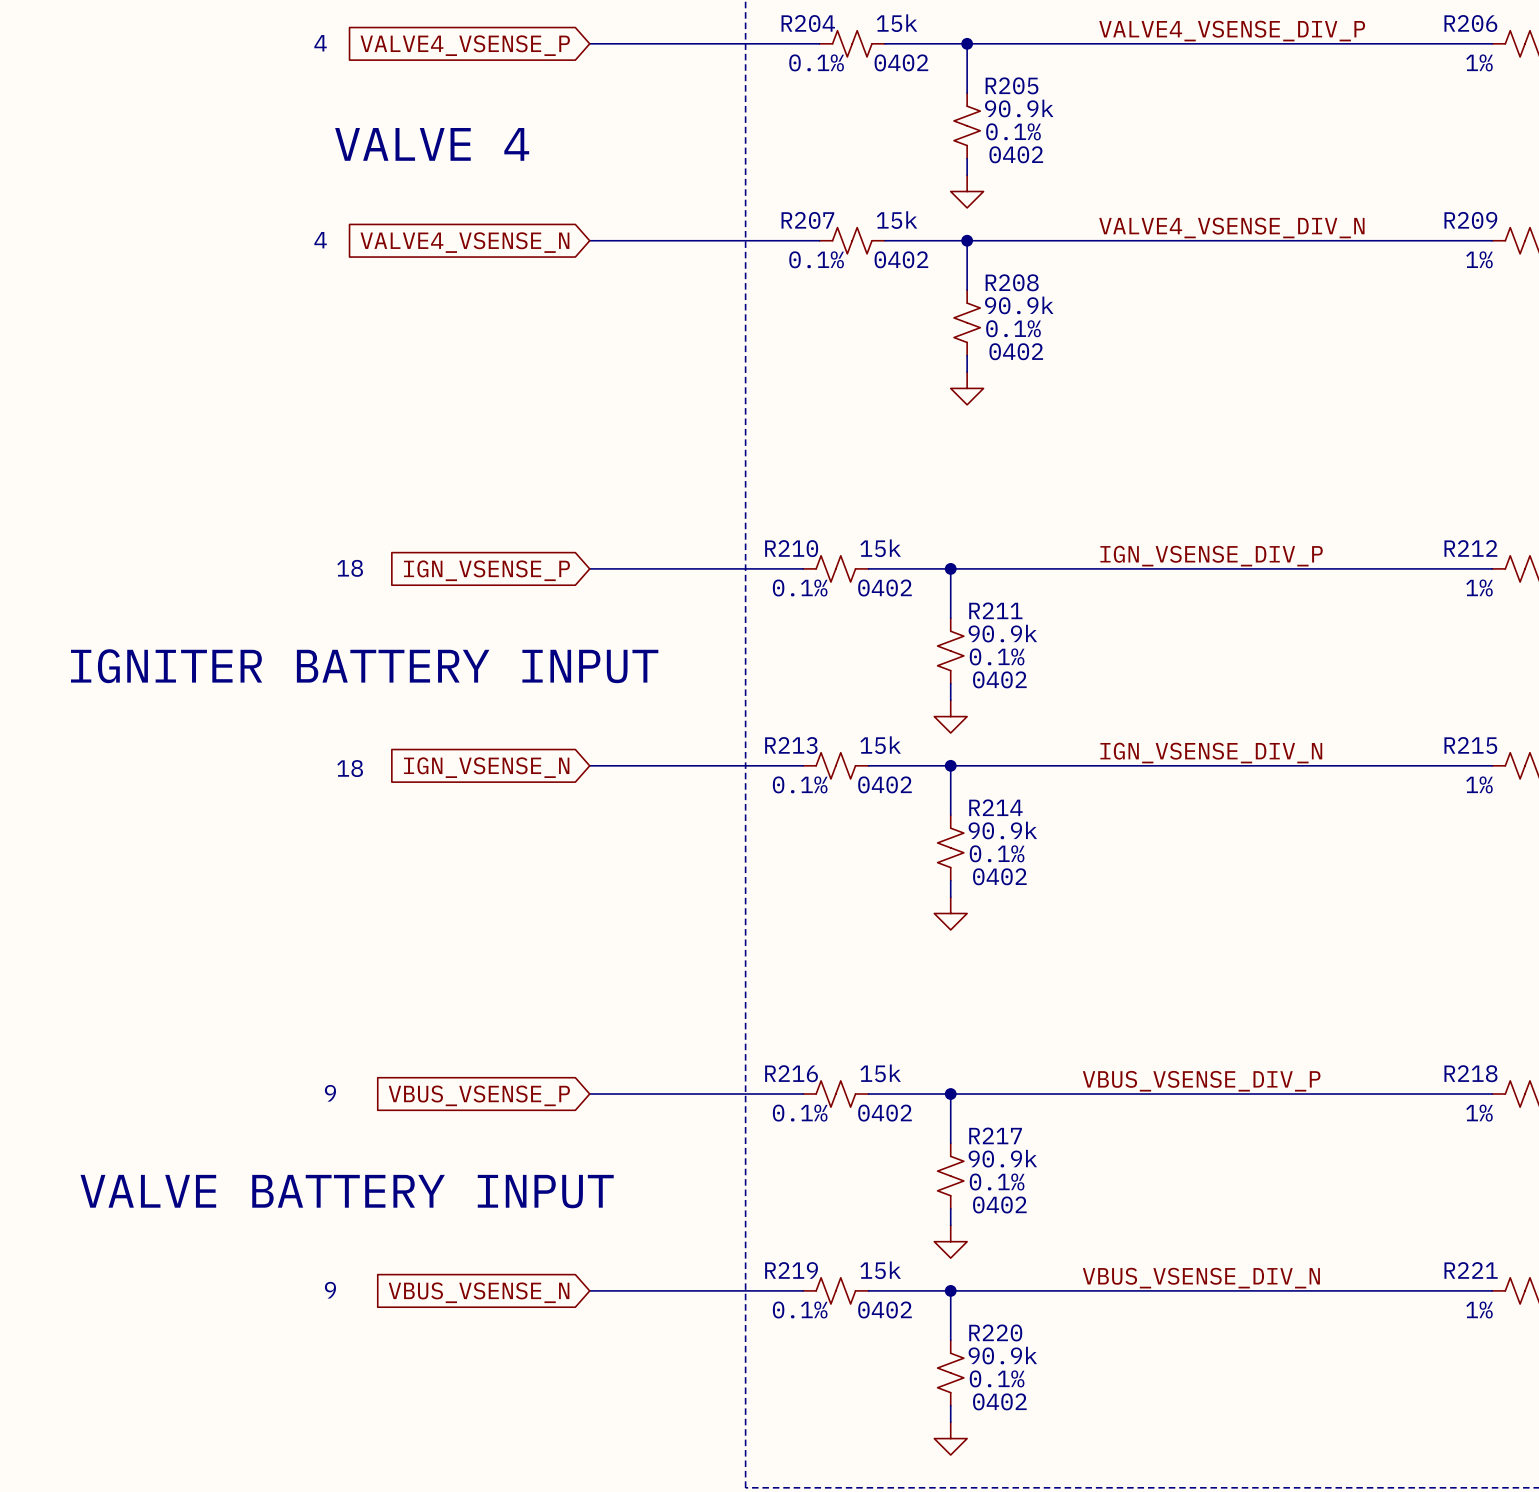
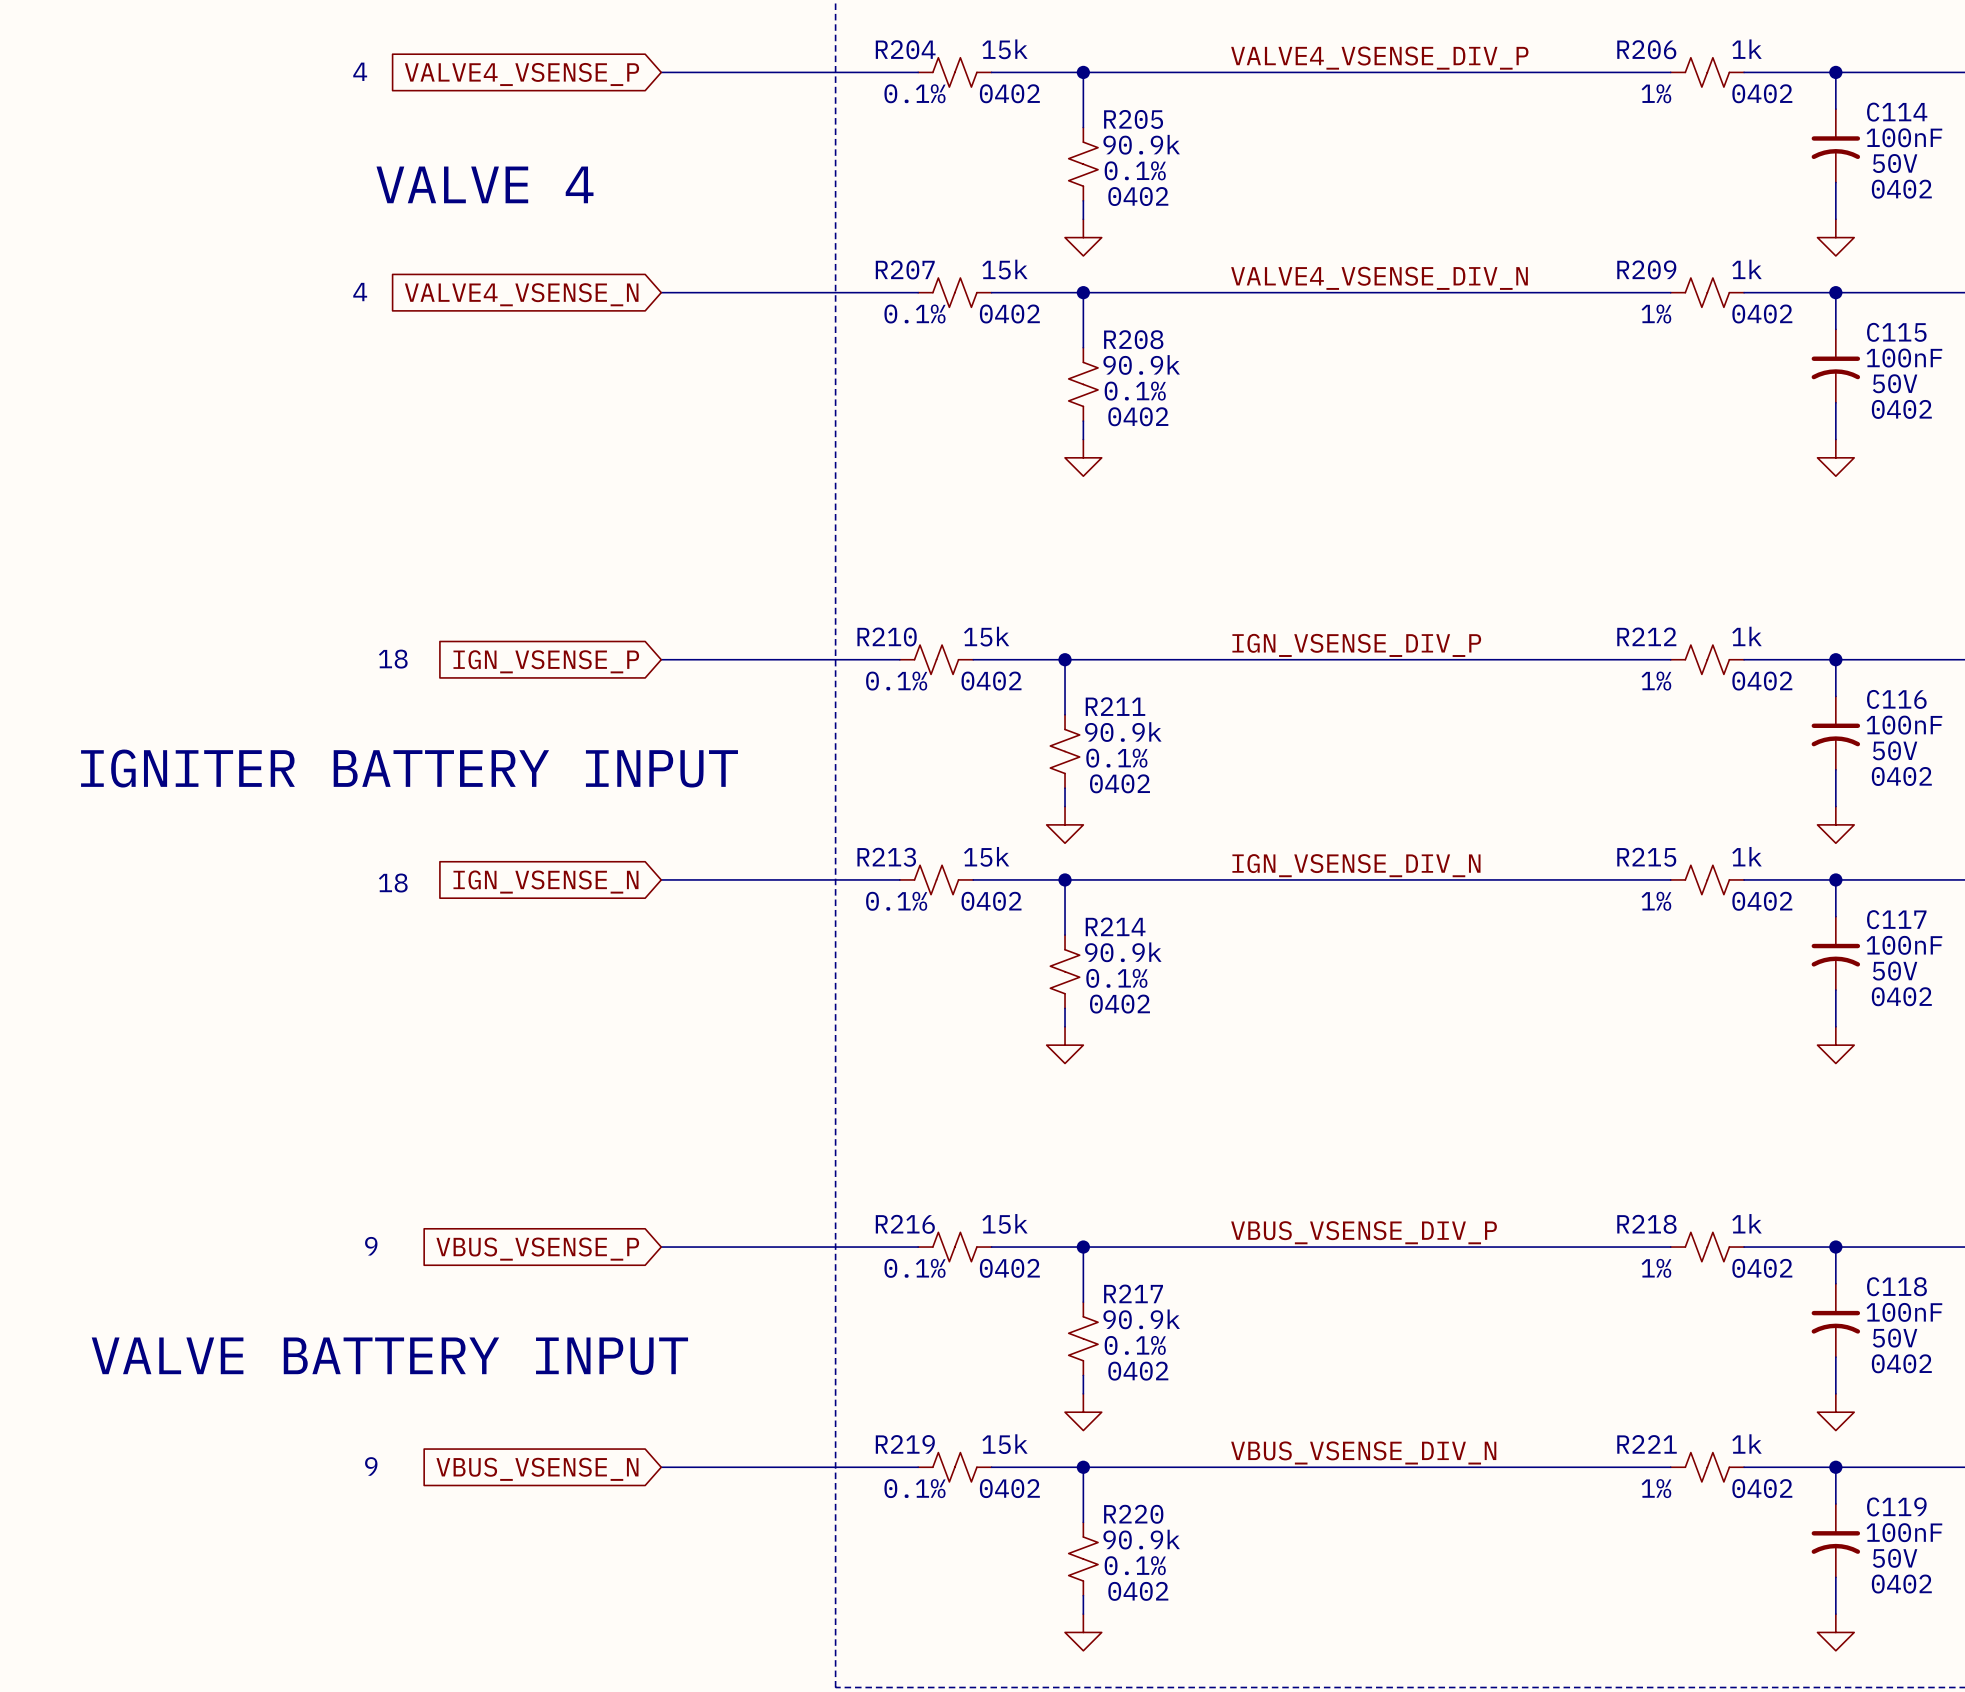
label position: VBUS_VSENSE_DIV_P (1201, 1081) -> VBUS_VSENSE_DIV_P (1364, 1232)
R216 position: (835, 1094) -> (954, 1247)
wire: (950, 1094) (950, 1143) -> (1083, 1247) (1083, 1302)
junction position: (950, 1094) -> (1083, 1247)
R217 position: (950, 1176) -> (1083, 1338)
wire: (950, 1208) (950, 1225) -> (1083, 1375) (1083, 1393)
power symbol position: (950, 1241) -> (1083, 1412)
label position: VBUS_VSENSE_DIV_N (1201, 1278) -> VBUS_VSENSE_DIV_N (1363, 1452)
R219 position: (835, 1290) -> (954, 1467)
wire: (950, 1290) (950, 1340) -> (1083, 1467) (1083, 1522)
junction position: (950, 1290) -> (1083, 1467)
R220 position: (950, 1372) -> (1083, 1559)
wire: (950, 1405) (950, 1422) -> (1083, 1595) (1083, 1614)
power symbol position: (950, 1438) -> (1083, 1632)

